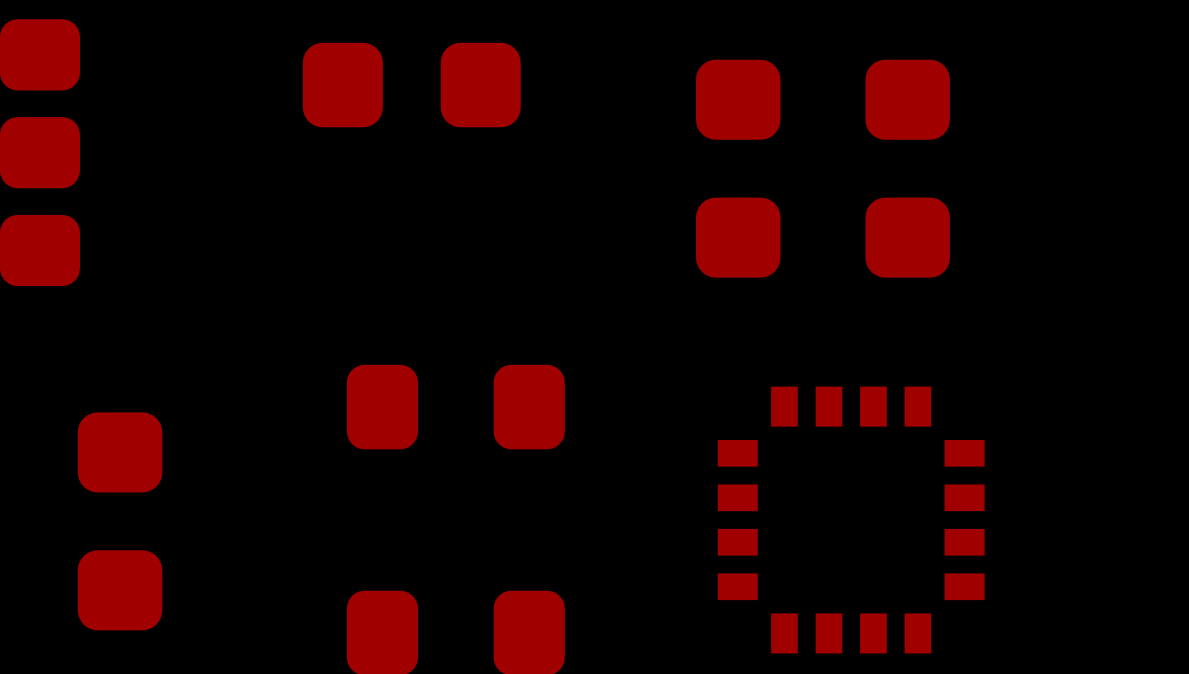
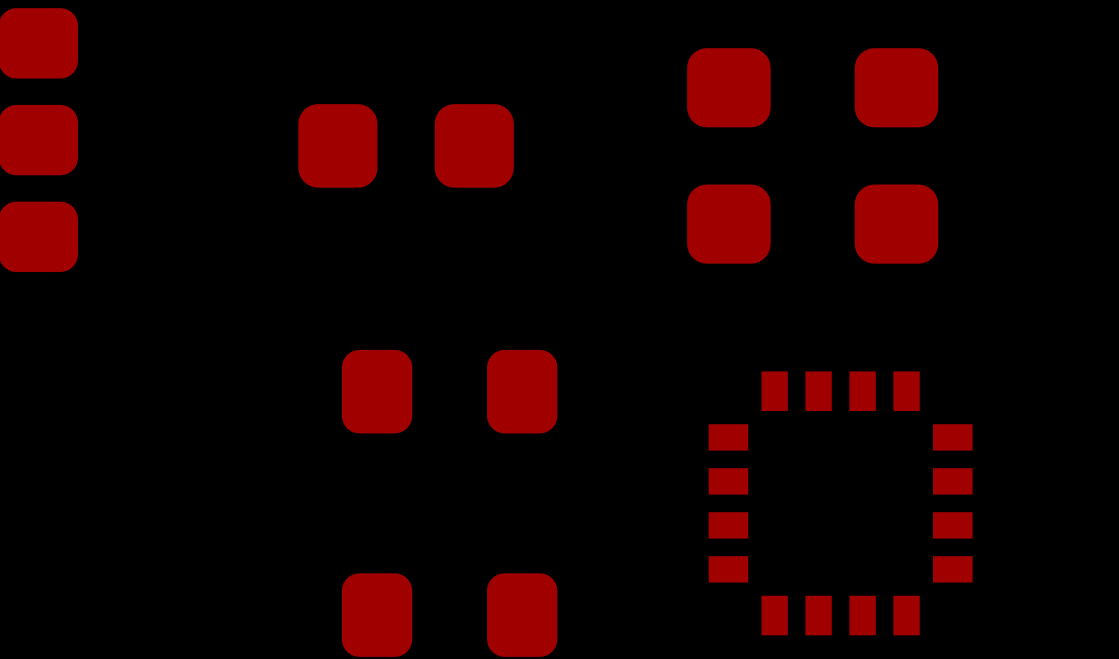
part position: (411, 85) -> (406, 145)
part: (120, 521) -> none

